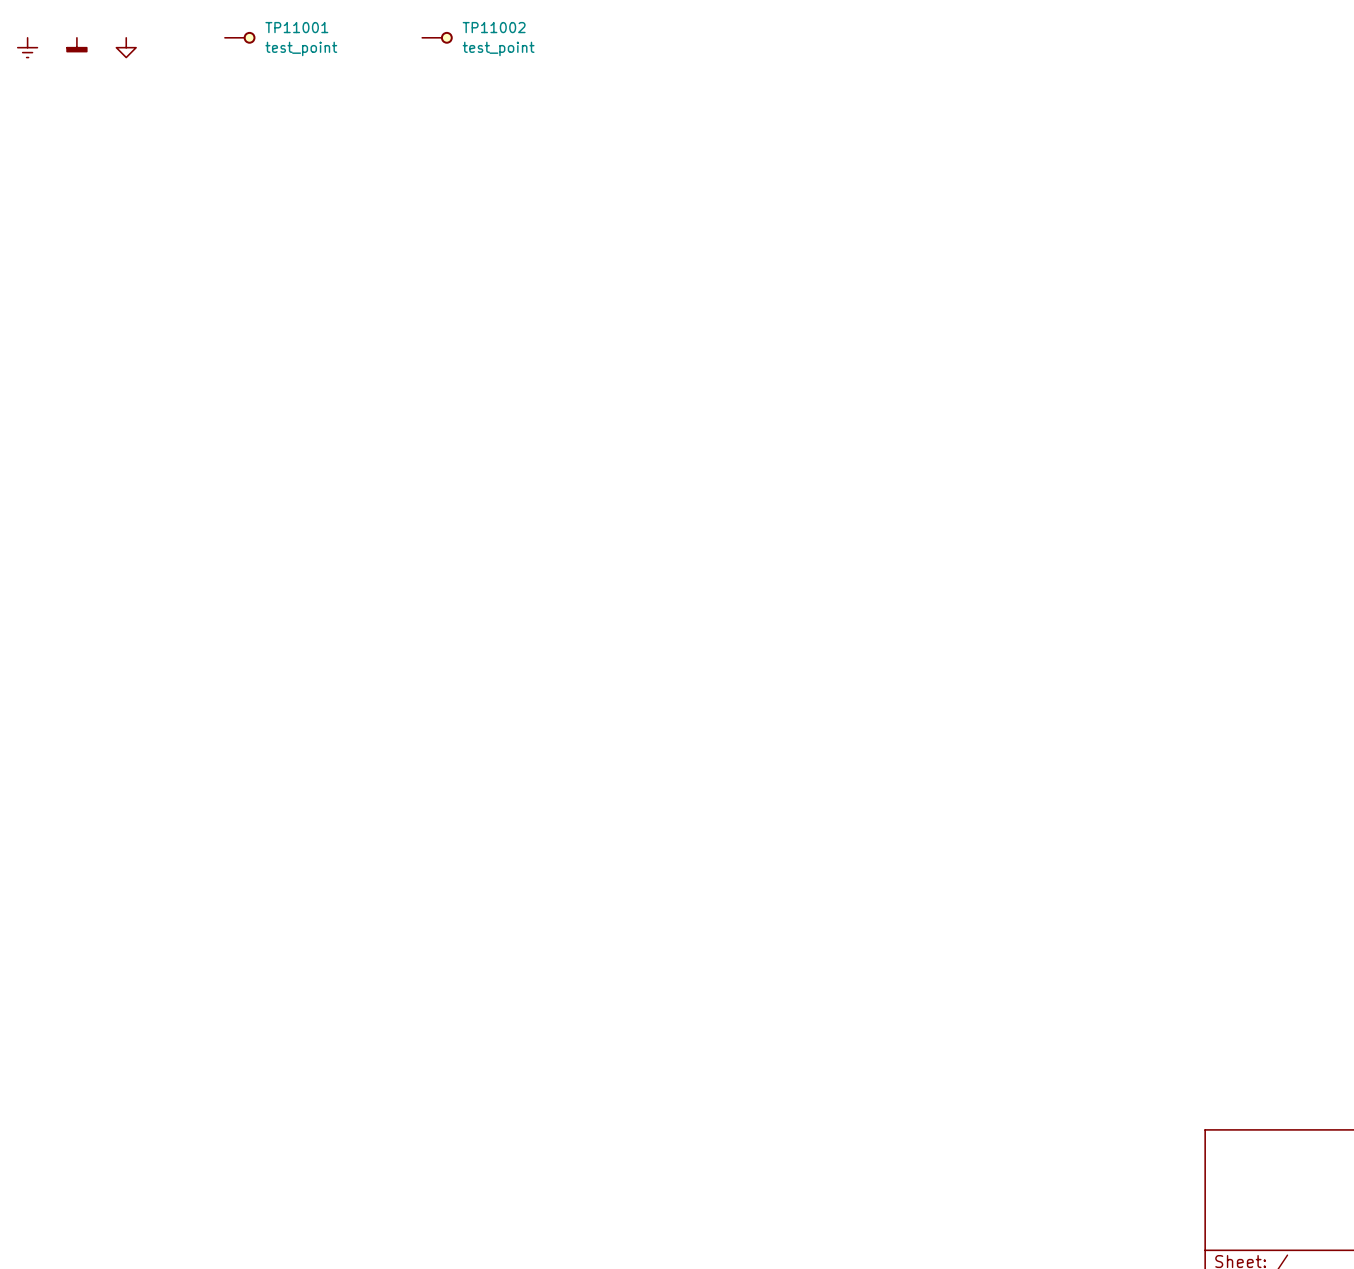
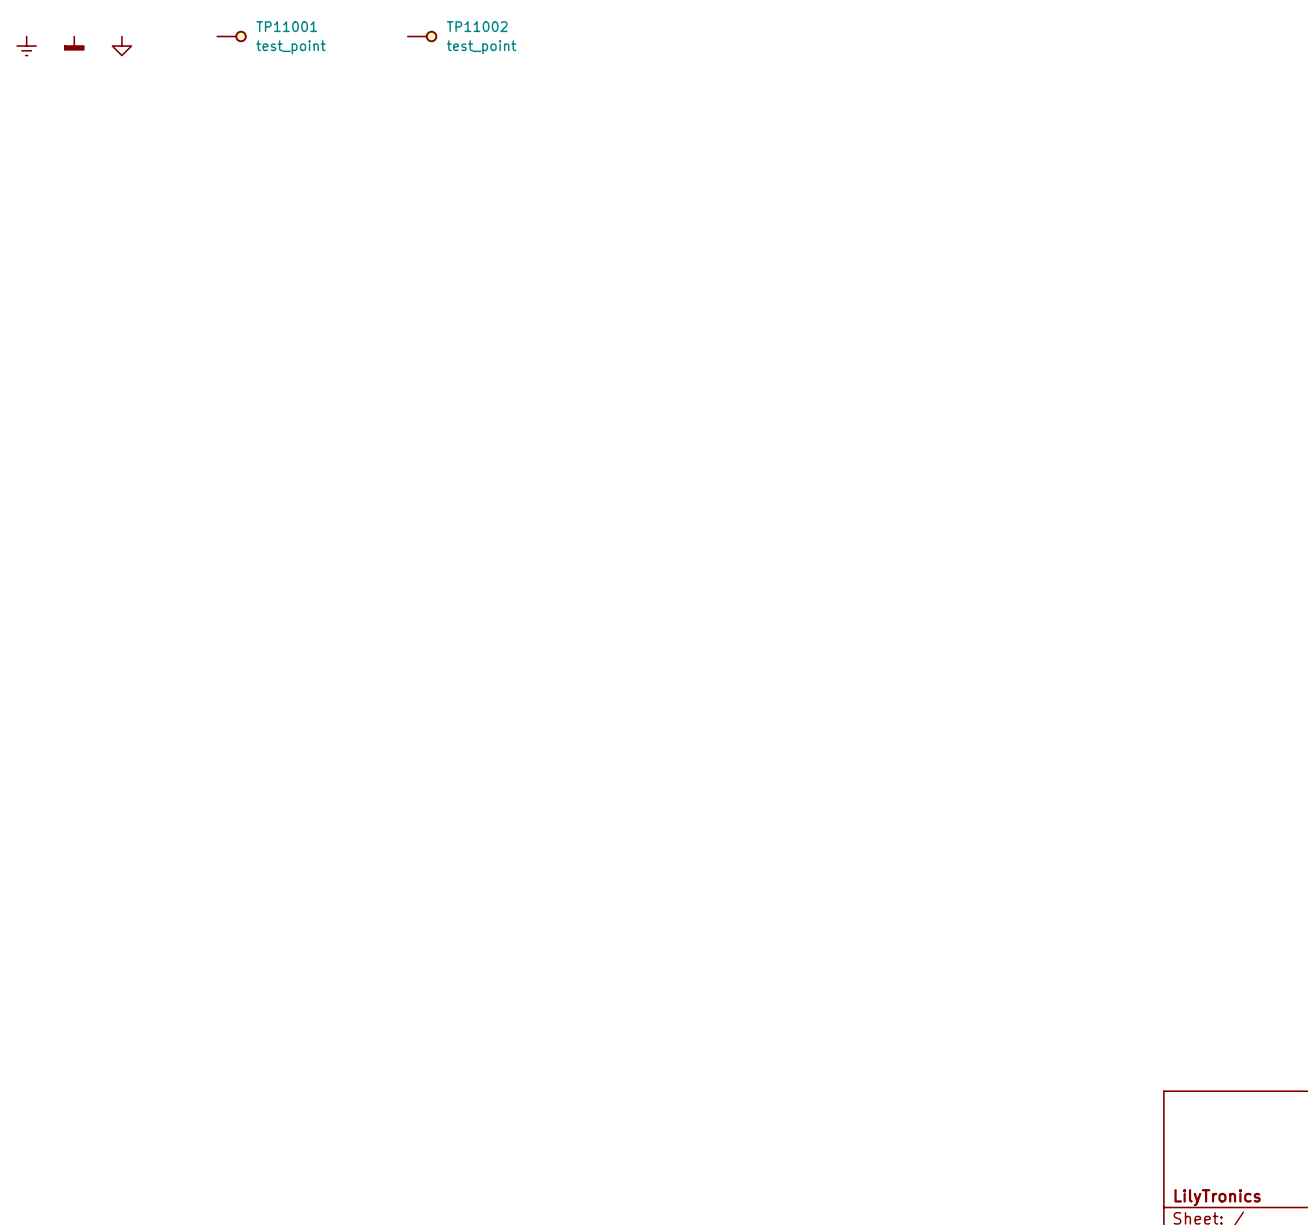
title block: none -> LilyTronics (1217, 1197)

